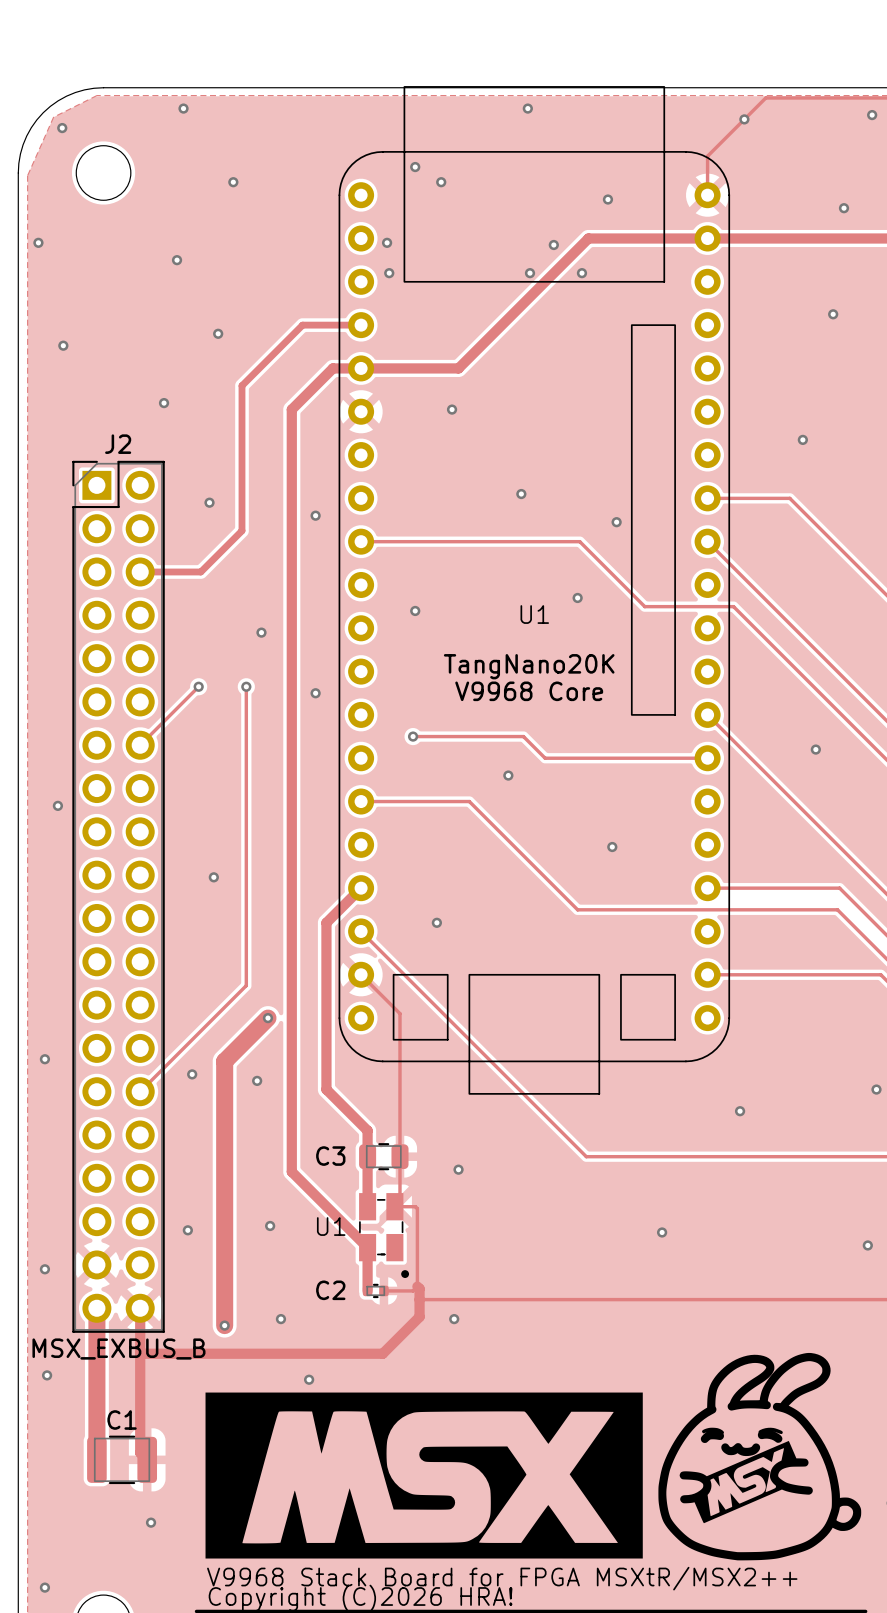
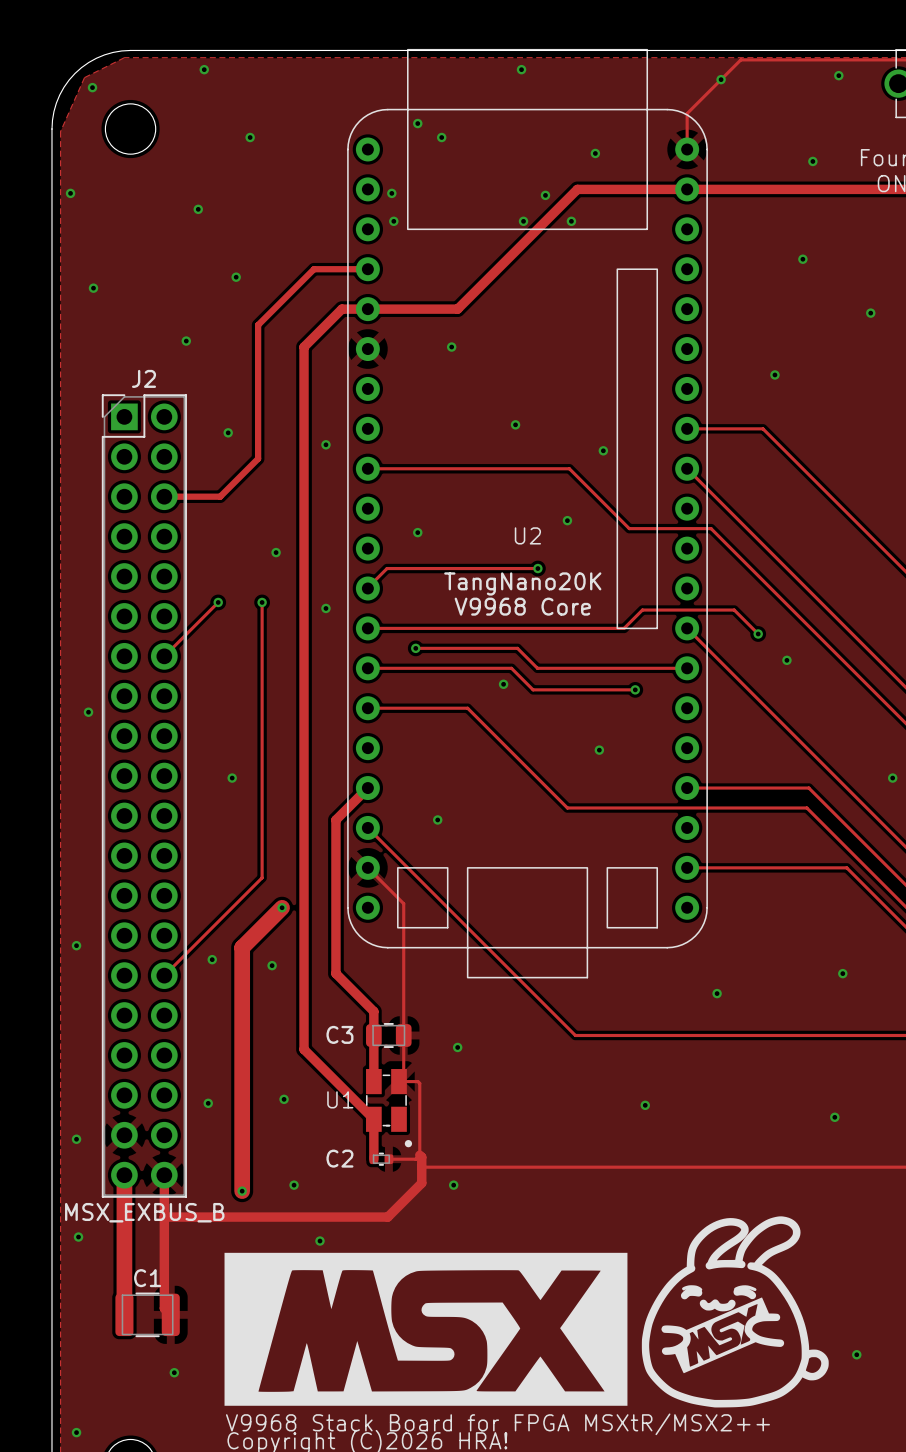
U1 name: U1 (534, 614) -> U2 (527, 535)
track: none -> (537, 568) (387, 568) (367, 588)
via: none -> (537, 568)
track: none -> (367, 628) (624, 628) (642, 610) (734, 610) (758, 633)
via: none -> (758, 633)
track: none -> (367, 668) (511, 668) (533, 689) (635, 689)
via: none -> (635, 689)

